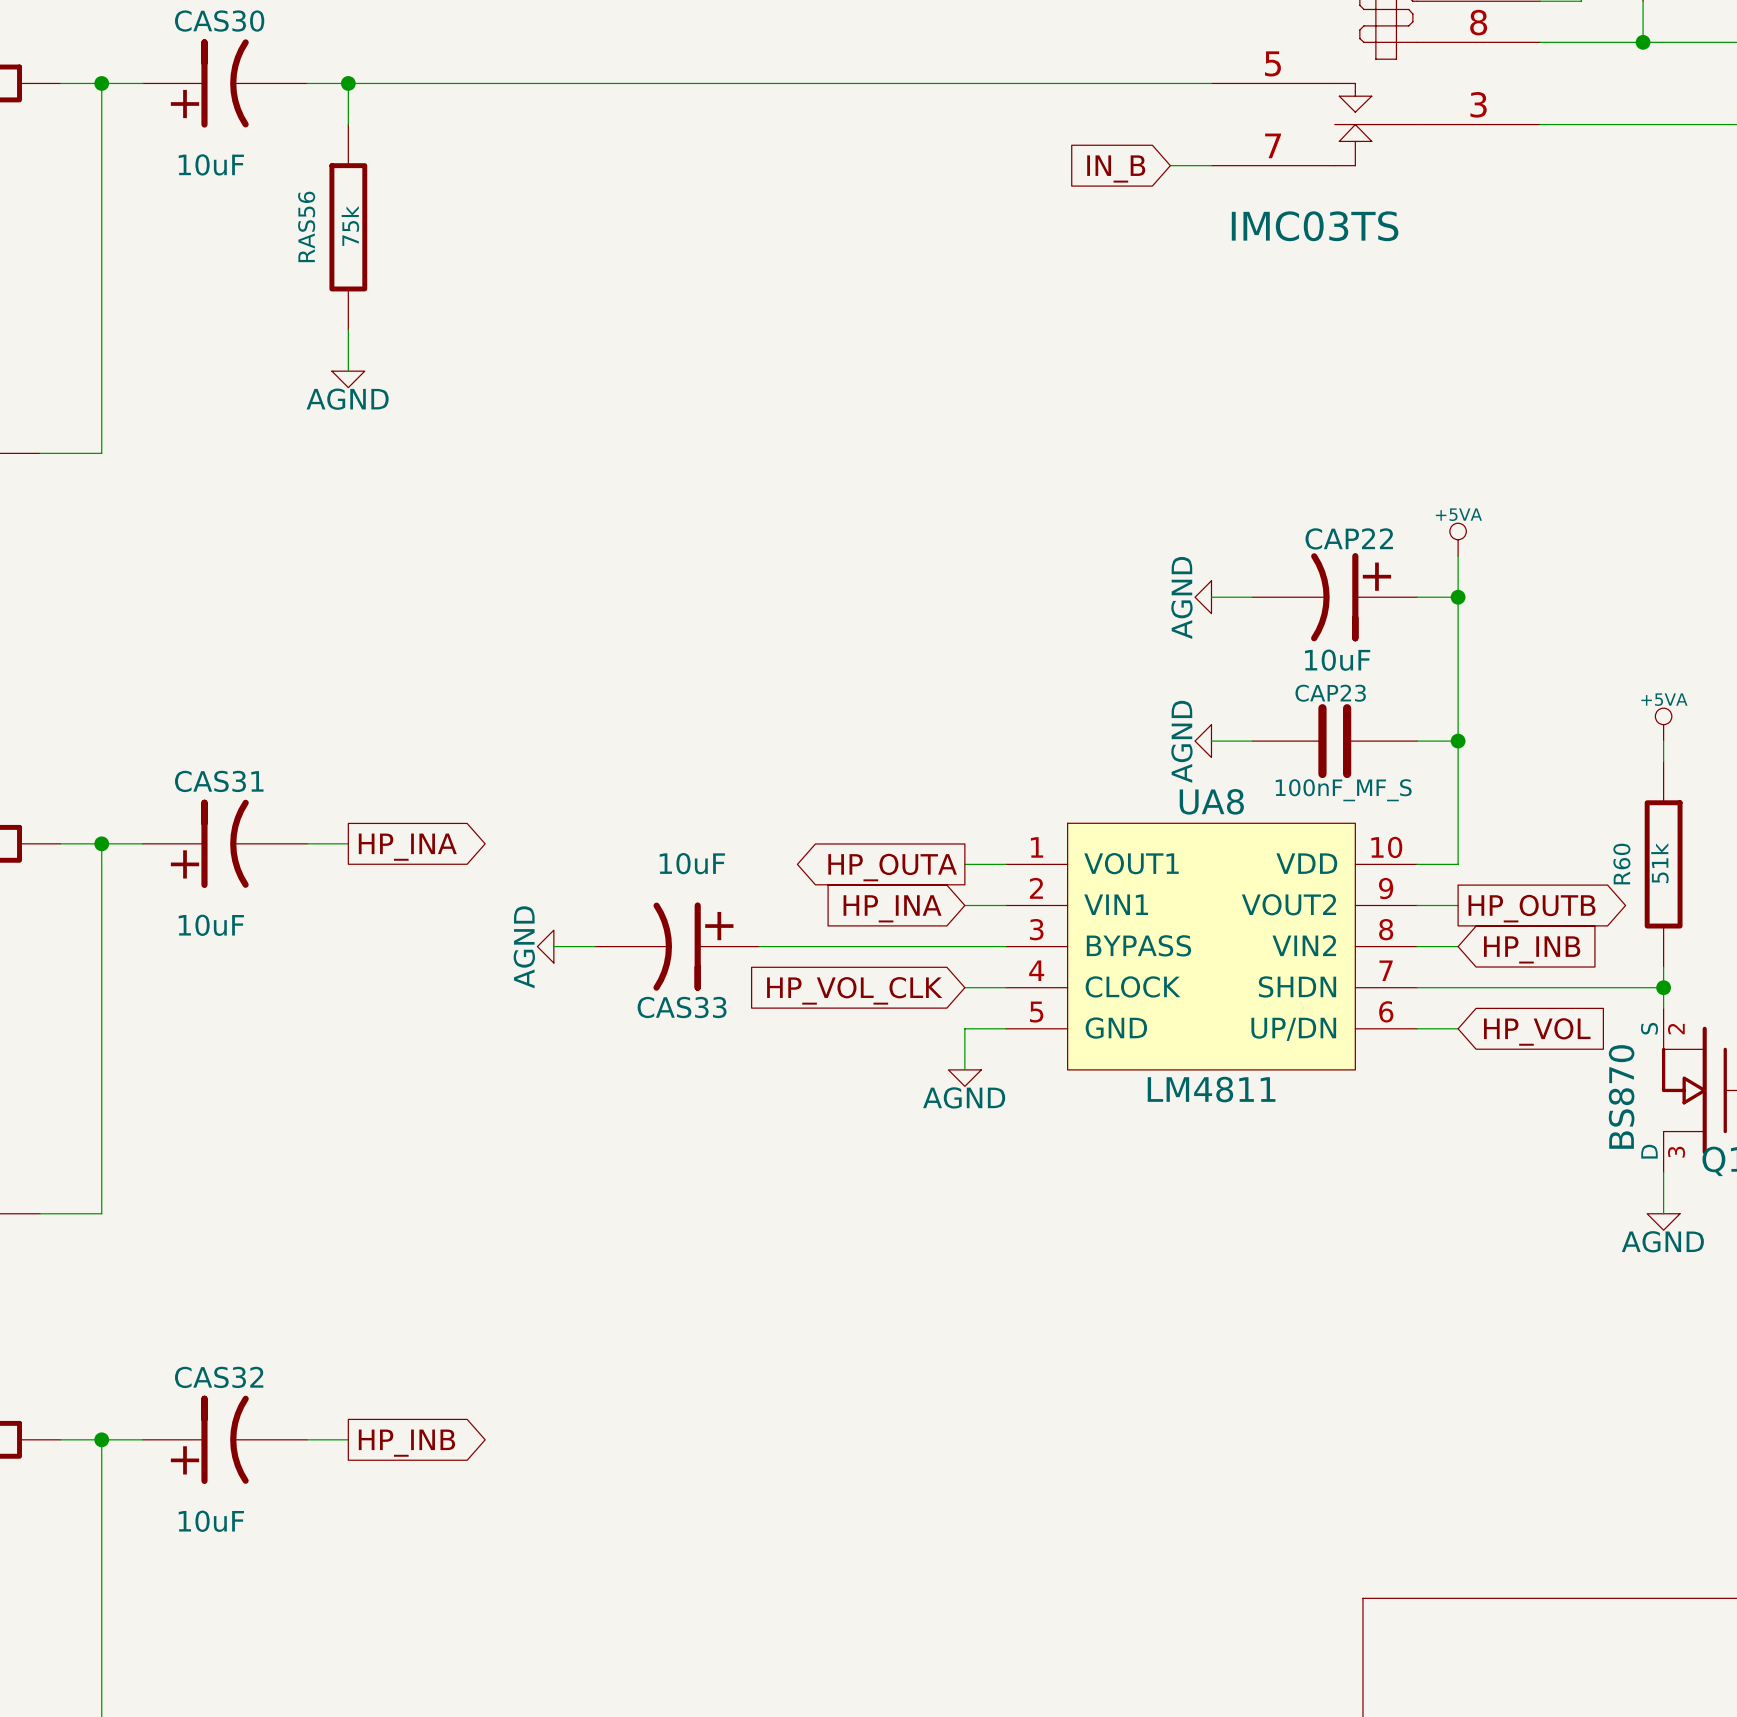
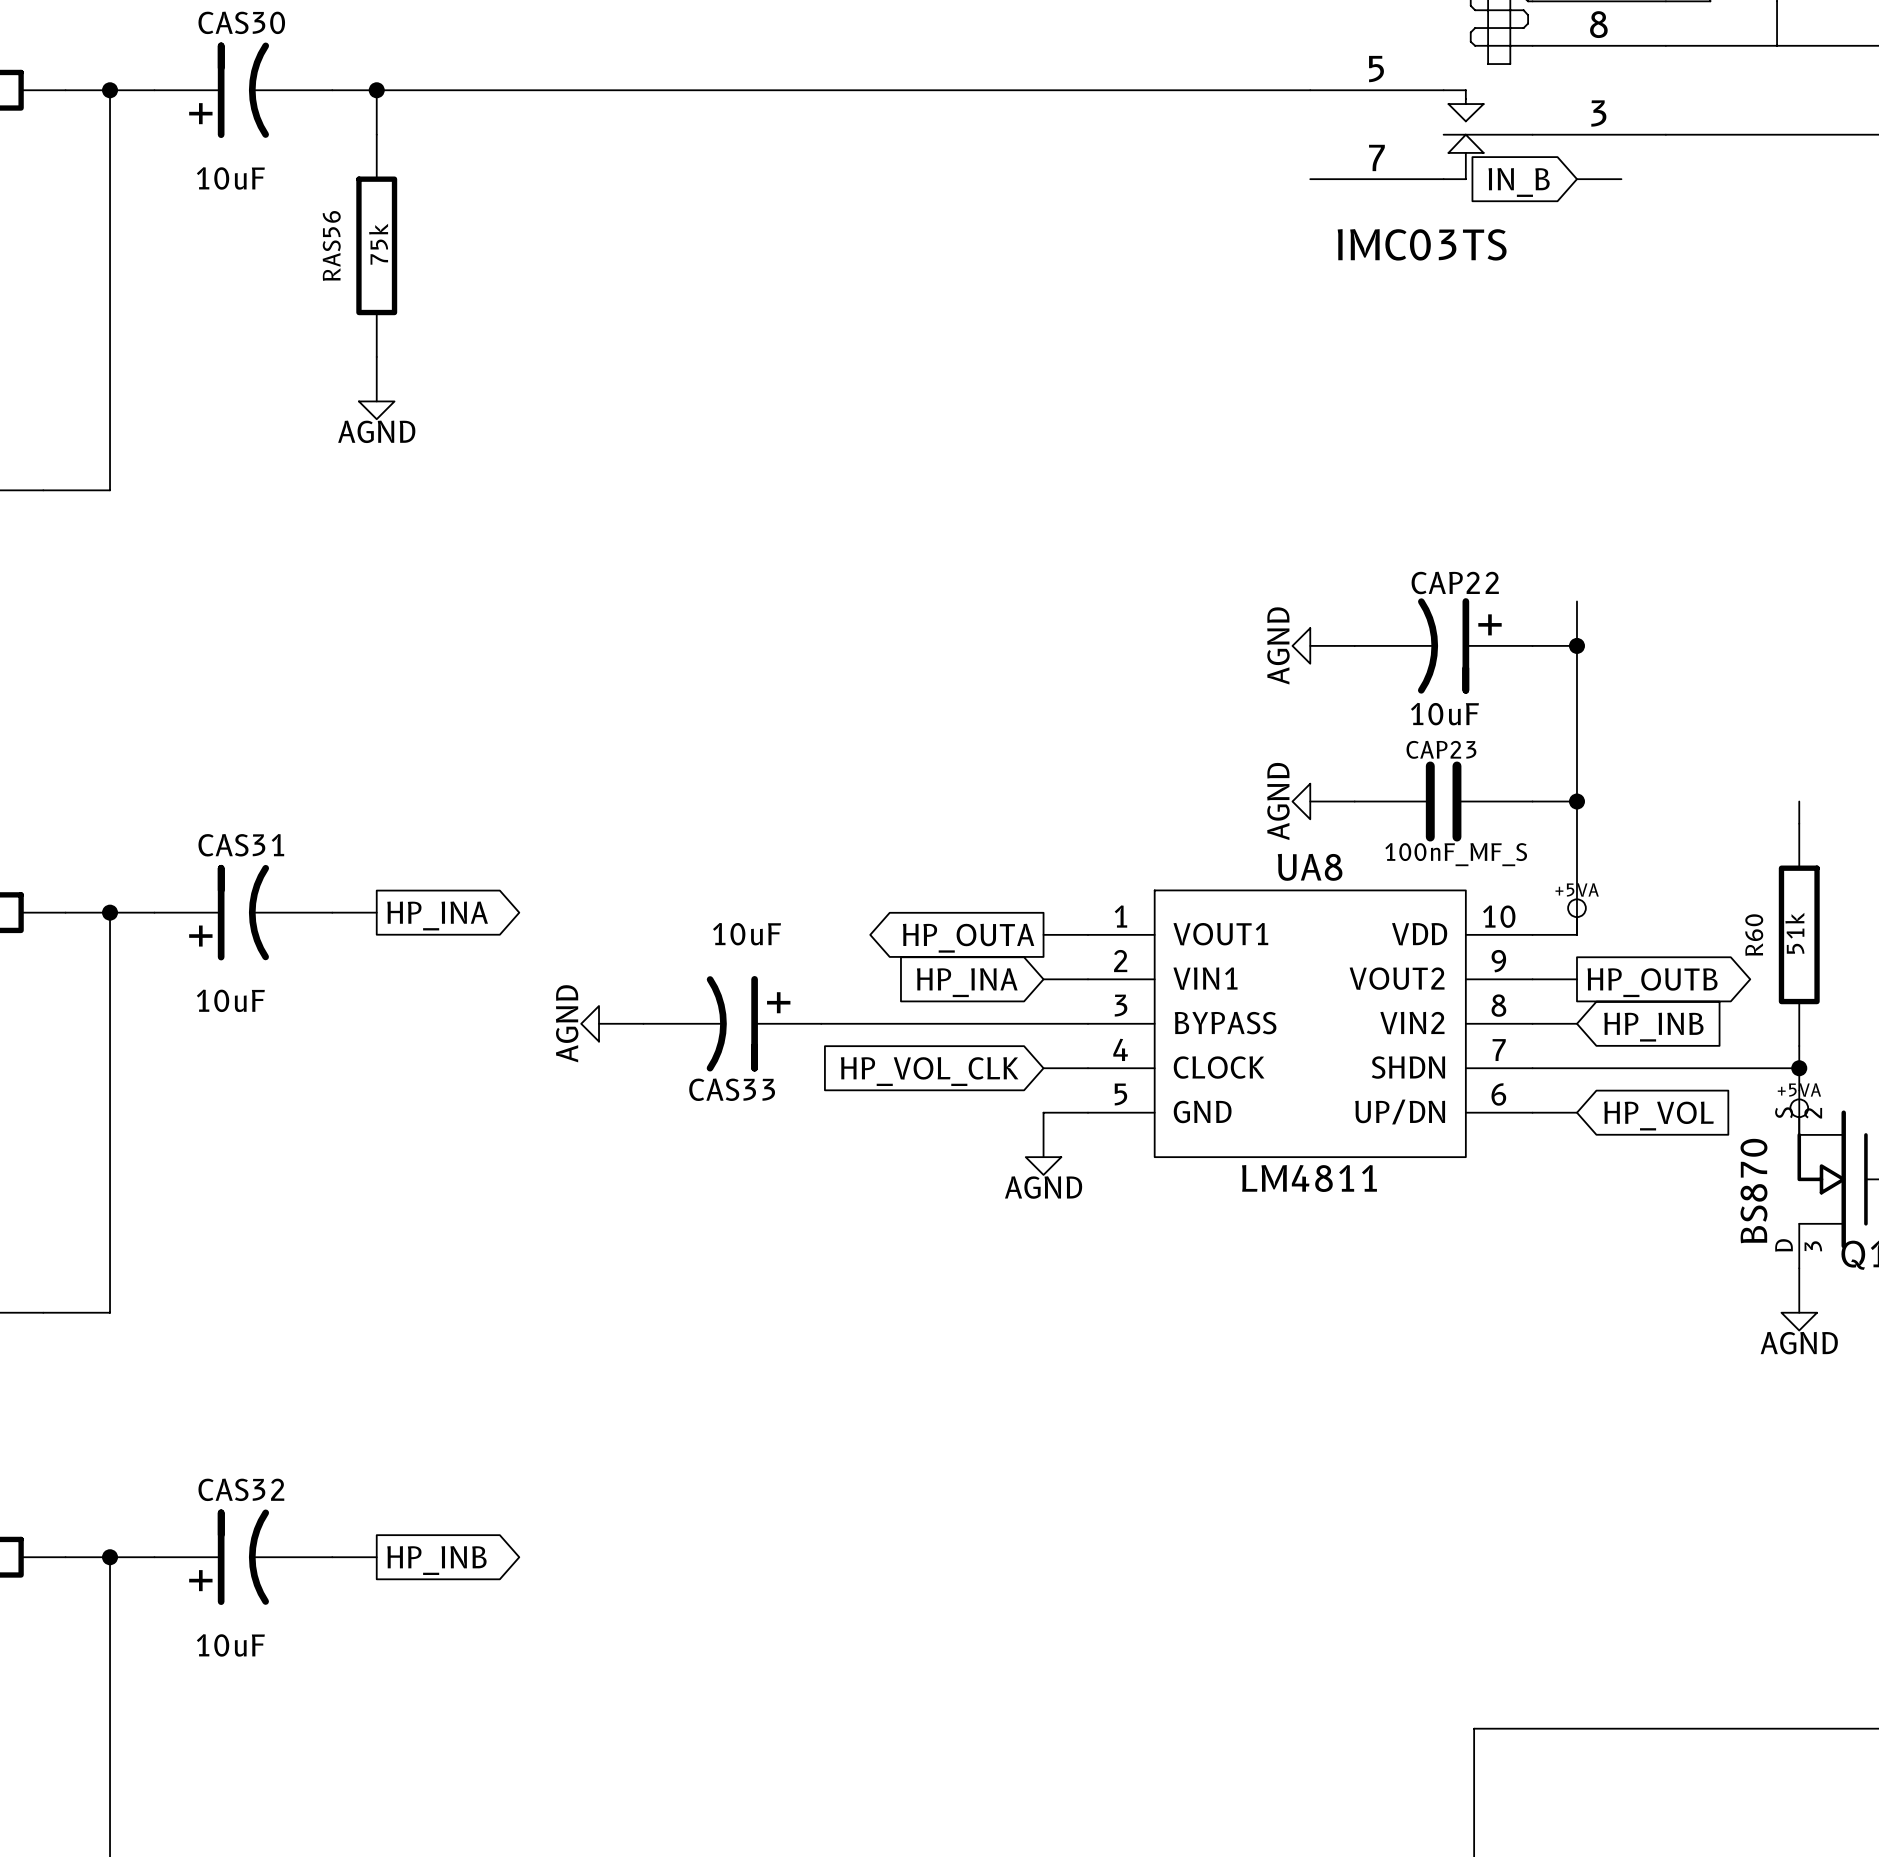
junction: (1643, 42) -> none
wire: (1170, 165) (1211, 165) -> (1576, 179) (1621, 179)
global label position: IN_B (1116, 168) -> IN_B (1519, 182)
power symbol: +5VA (1458, 539) -> none
power symbol: +5VA (1663, 724) -> none
power symbol: none -> +5VA (1576, 917)
power symbol: none -> +5VA (1799, 1117)

